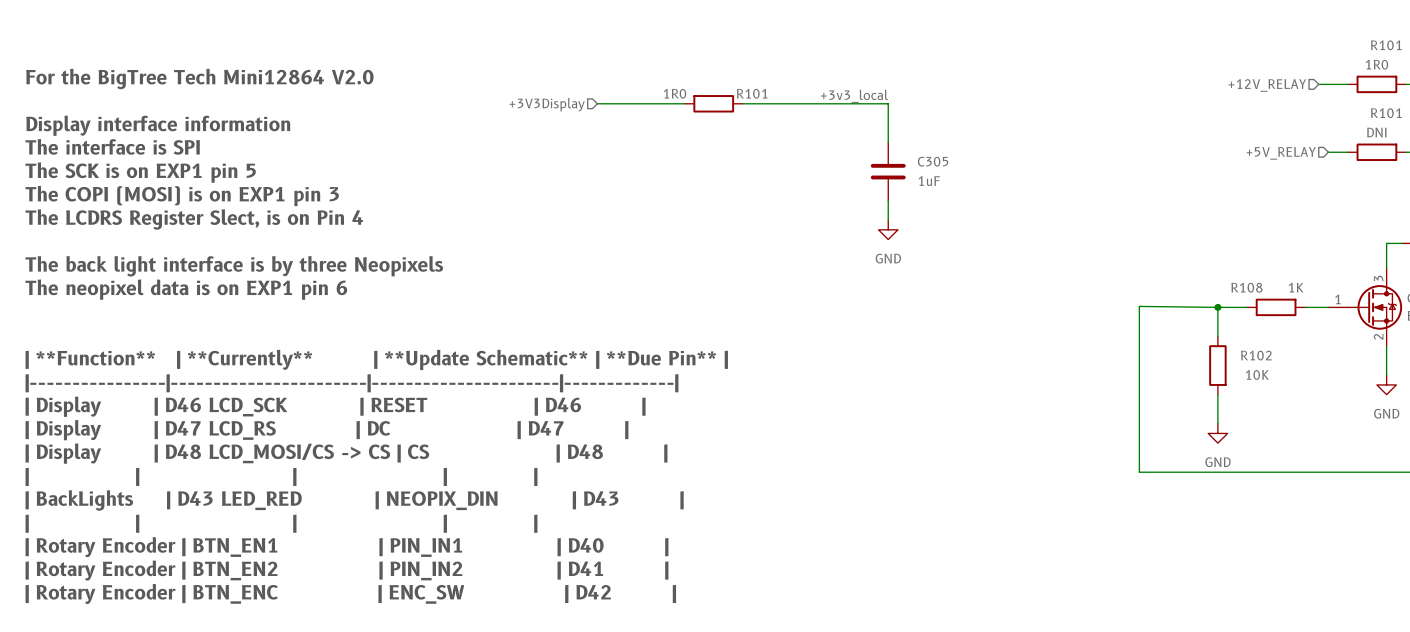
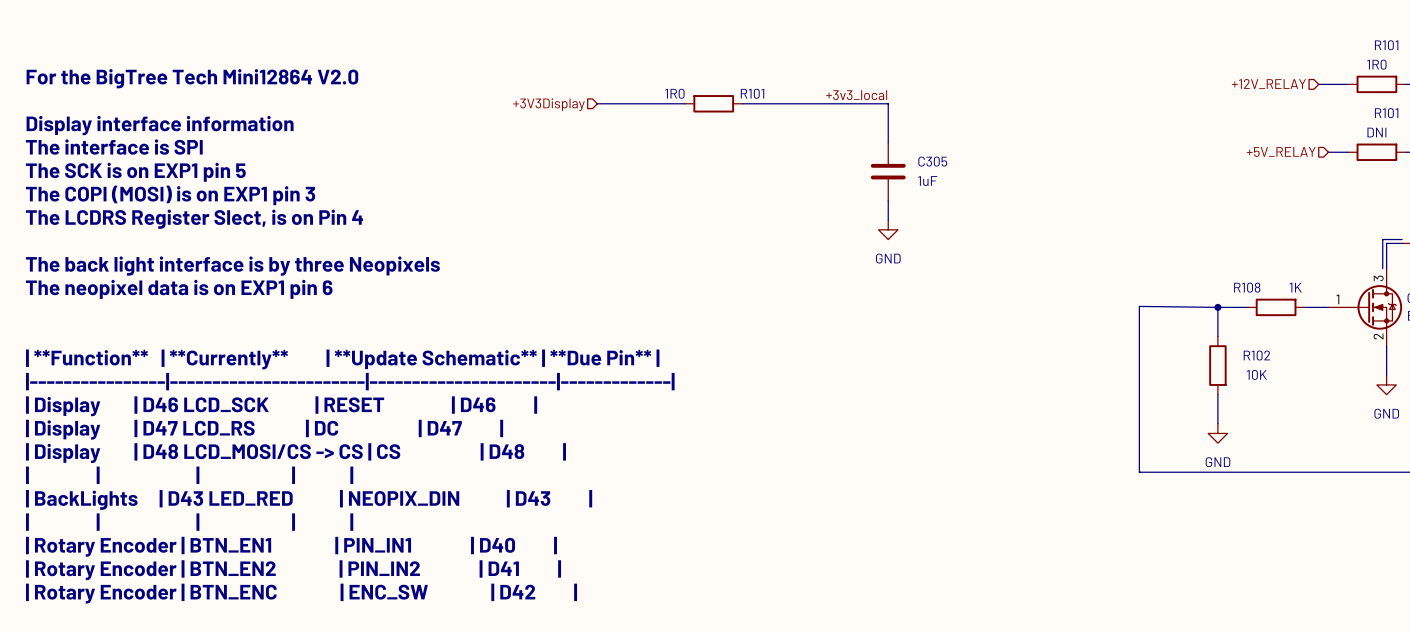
wire: none -> (1402, 239) (1382, 239) (1382, 268)

